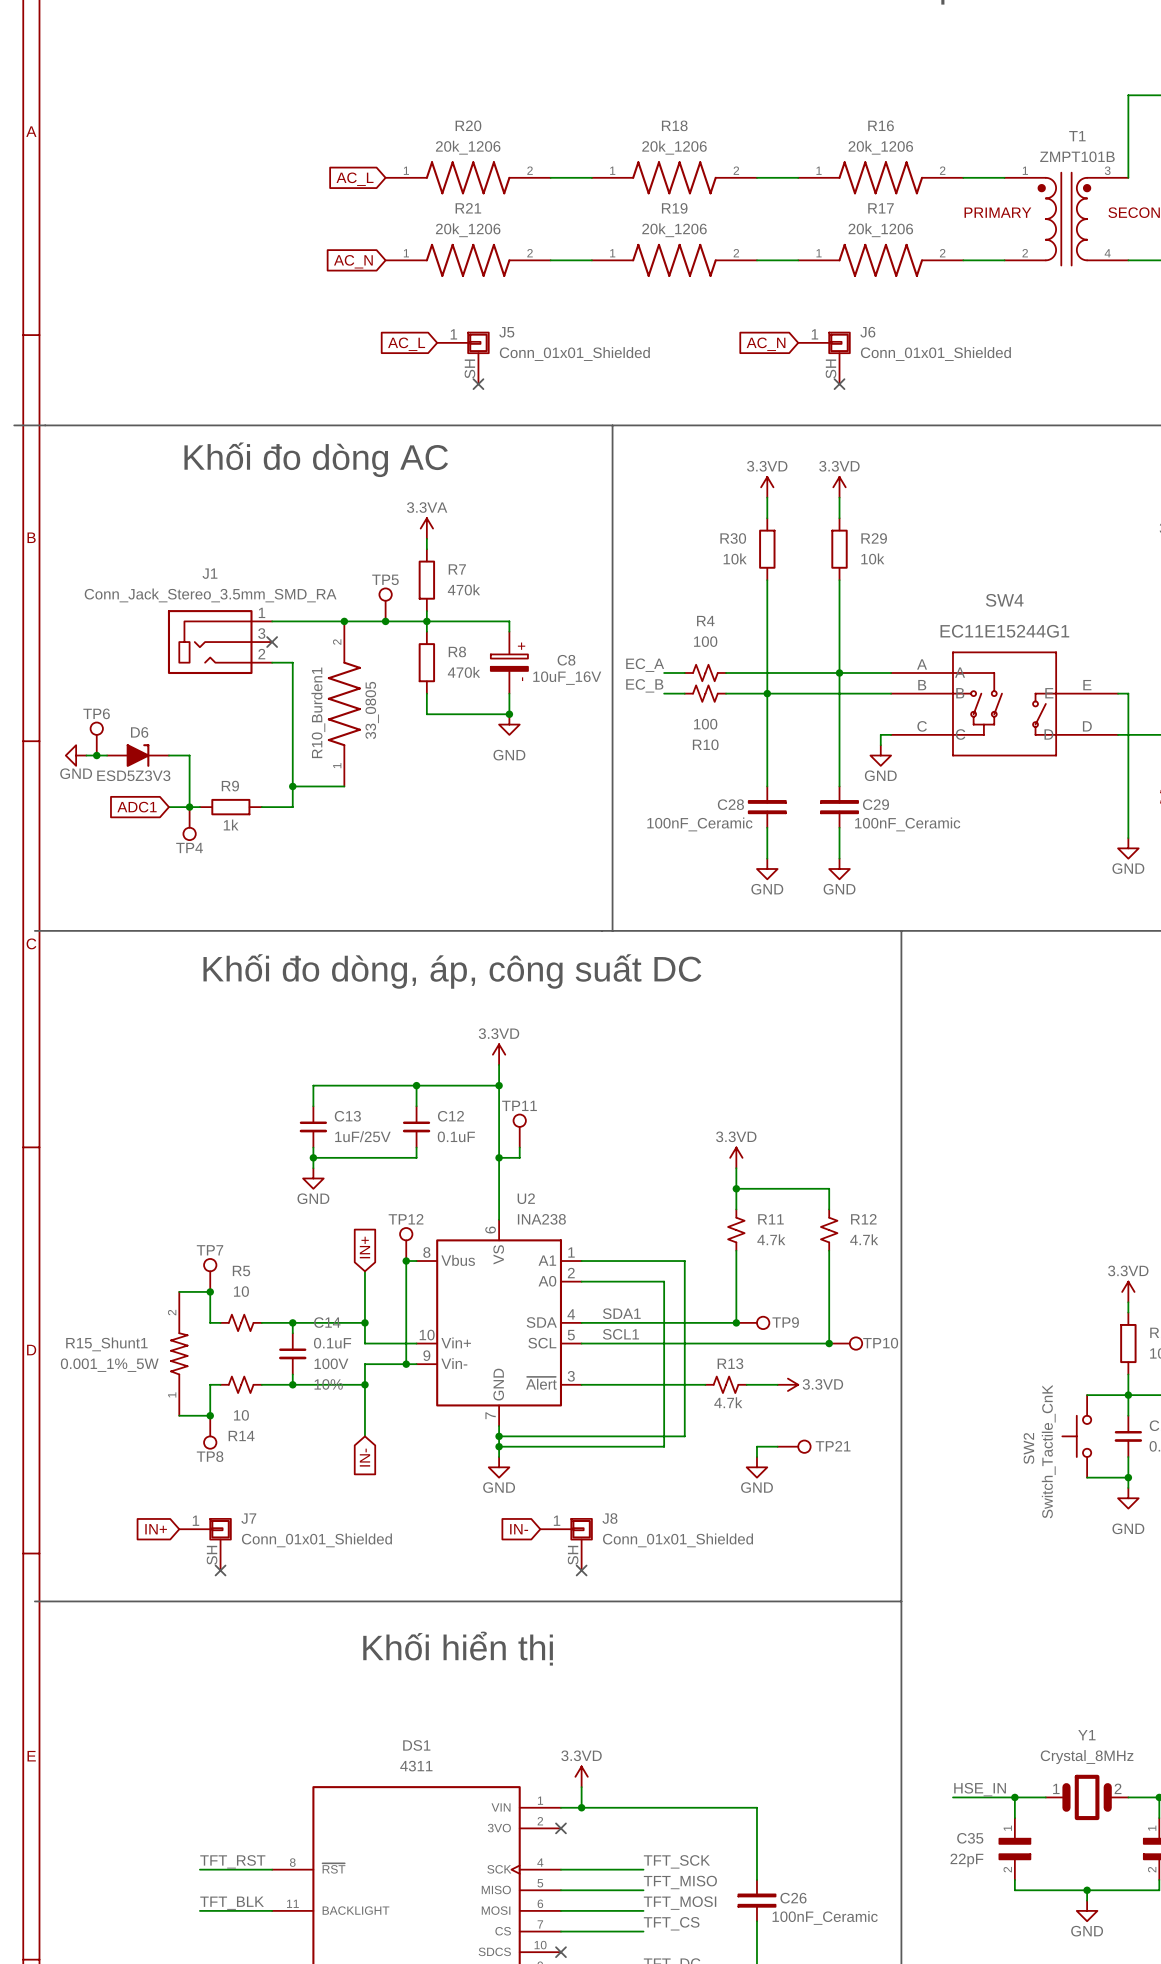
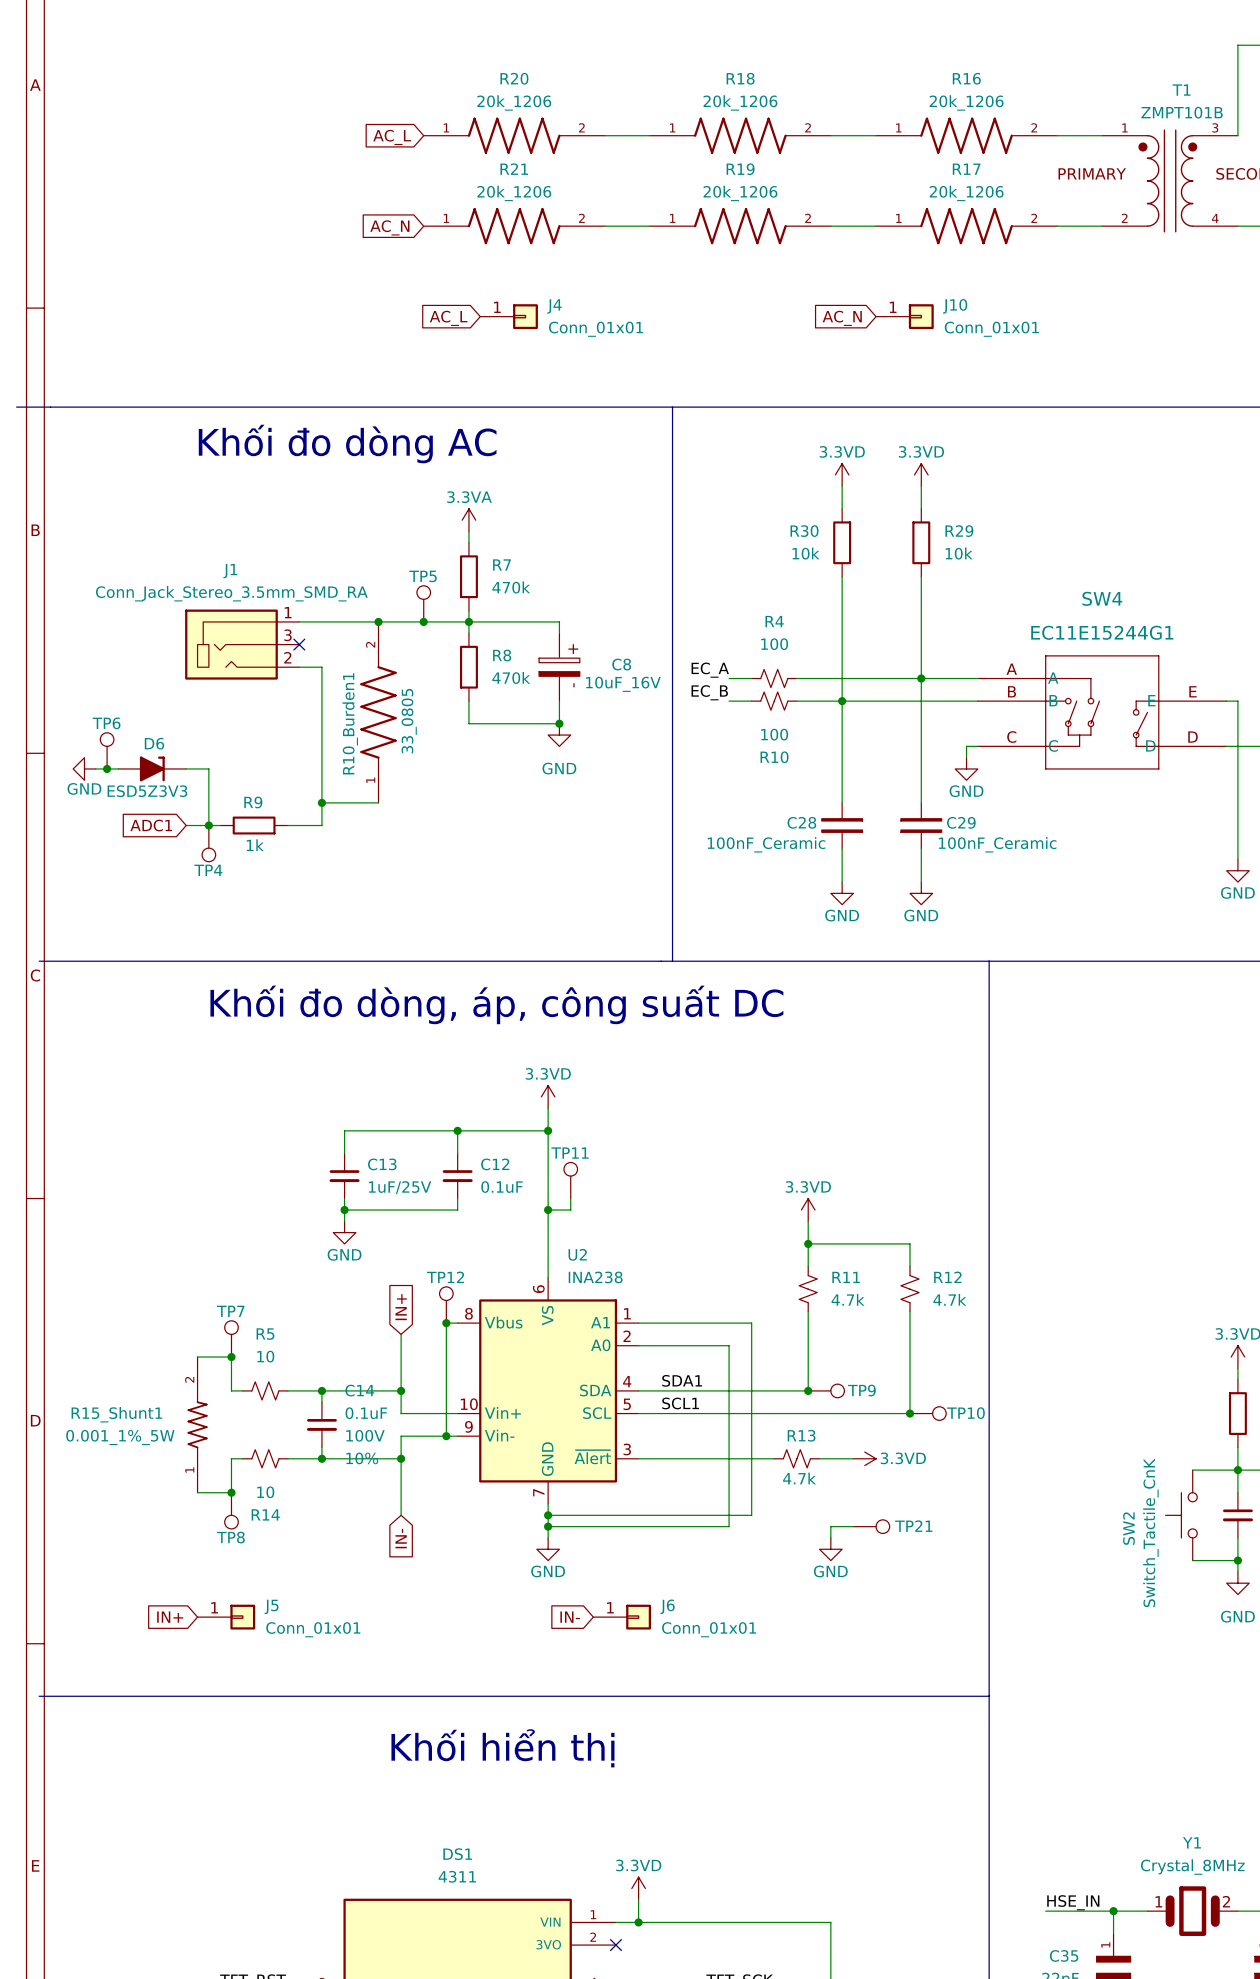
J5 symbol: [437, 331, 490, 385] -> [197, 1604, 256, 1630]
J6 symbol: [798, 331, 851, 385] -> [593, 1604, 652, 1630]
J4: none -> Conn_01x01 (509, 316)
J10: none -> Conn_01x01 (904, 316)
J5 value: Conn_01x01_Shielded (574, 354) -> Conn_01x01 (313, 1629)
J6 value: Conn_01x01_Shielded (935, 354) -> Conn_01x01 (709, 1629)
no-connect mark: (478, 384) -> none
no-connect mark: (839, 384) -> none
J7: Conn_01x01_Shielded (205, 1544) -> none
J8: Conn_01x01_Shielded (566, 1544) -> none
no-connect mark: (220, 1570) -> none
no-connect mark: (581, 1570) -> none

